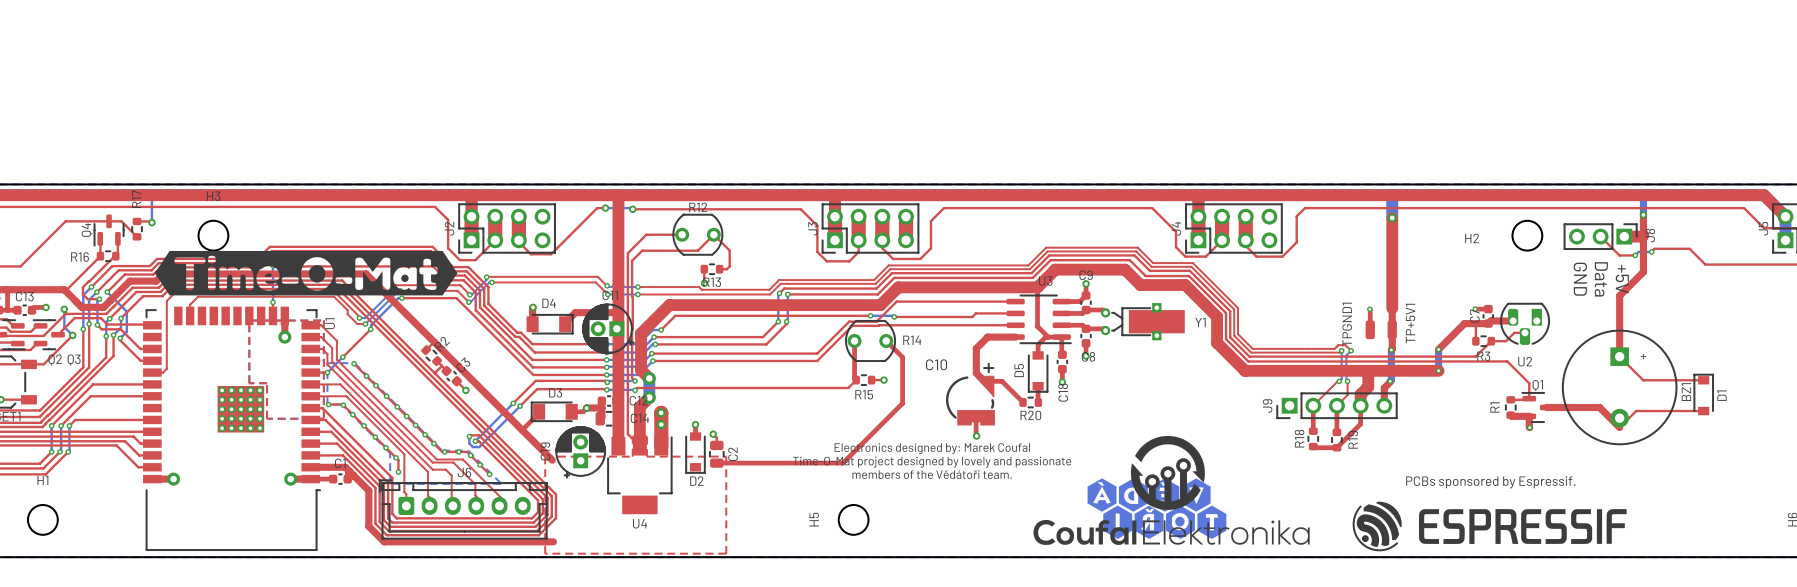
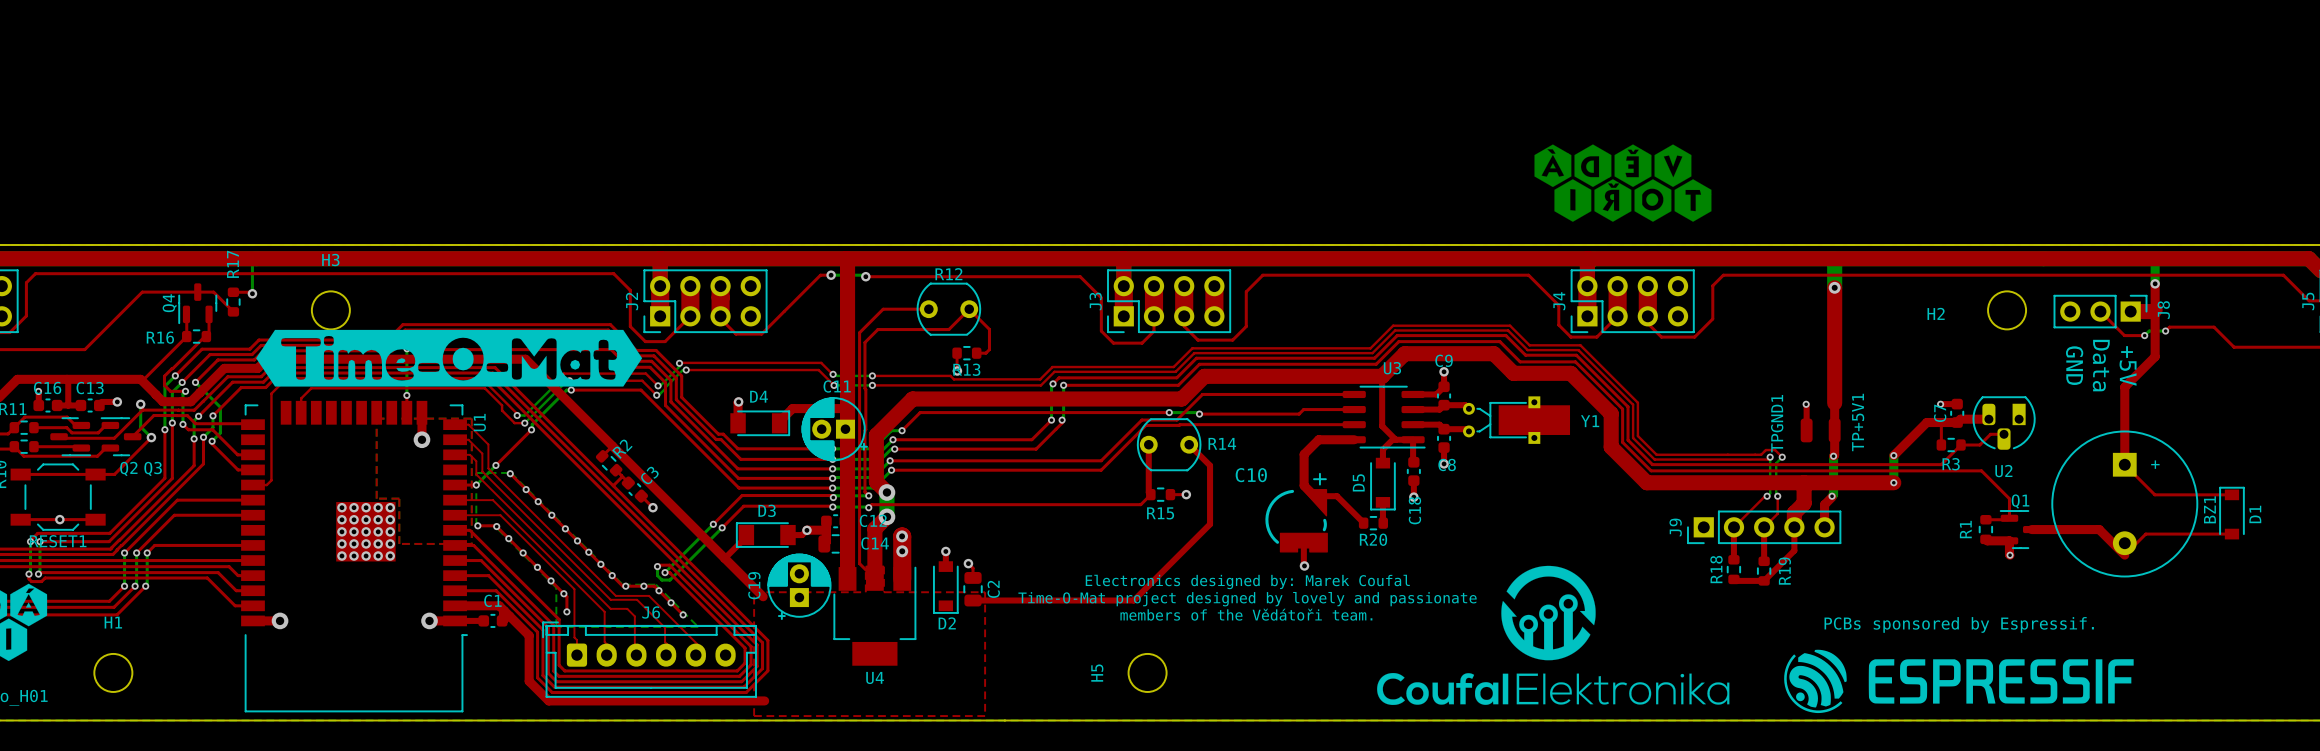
drawing: none -> [1534, 144, 1712, 222]
drawing: [1087, 478, 1227, 539] -> none

